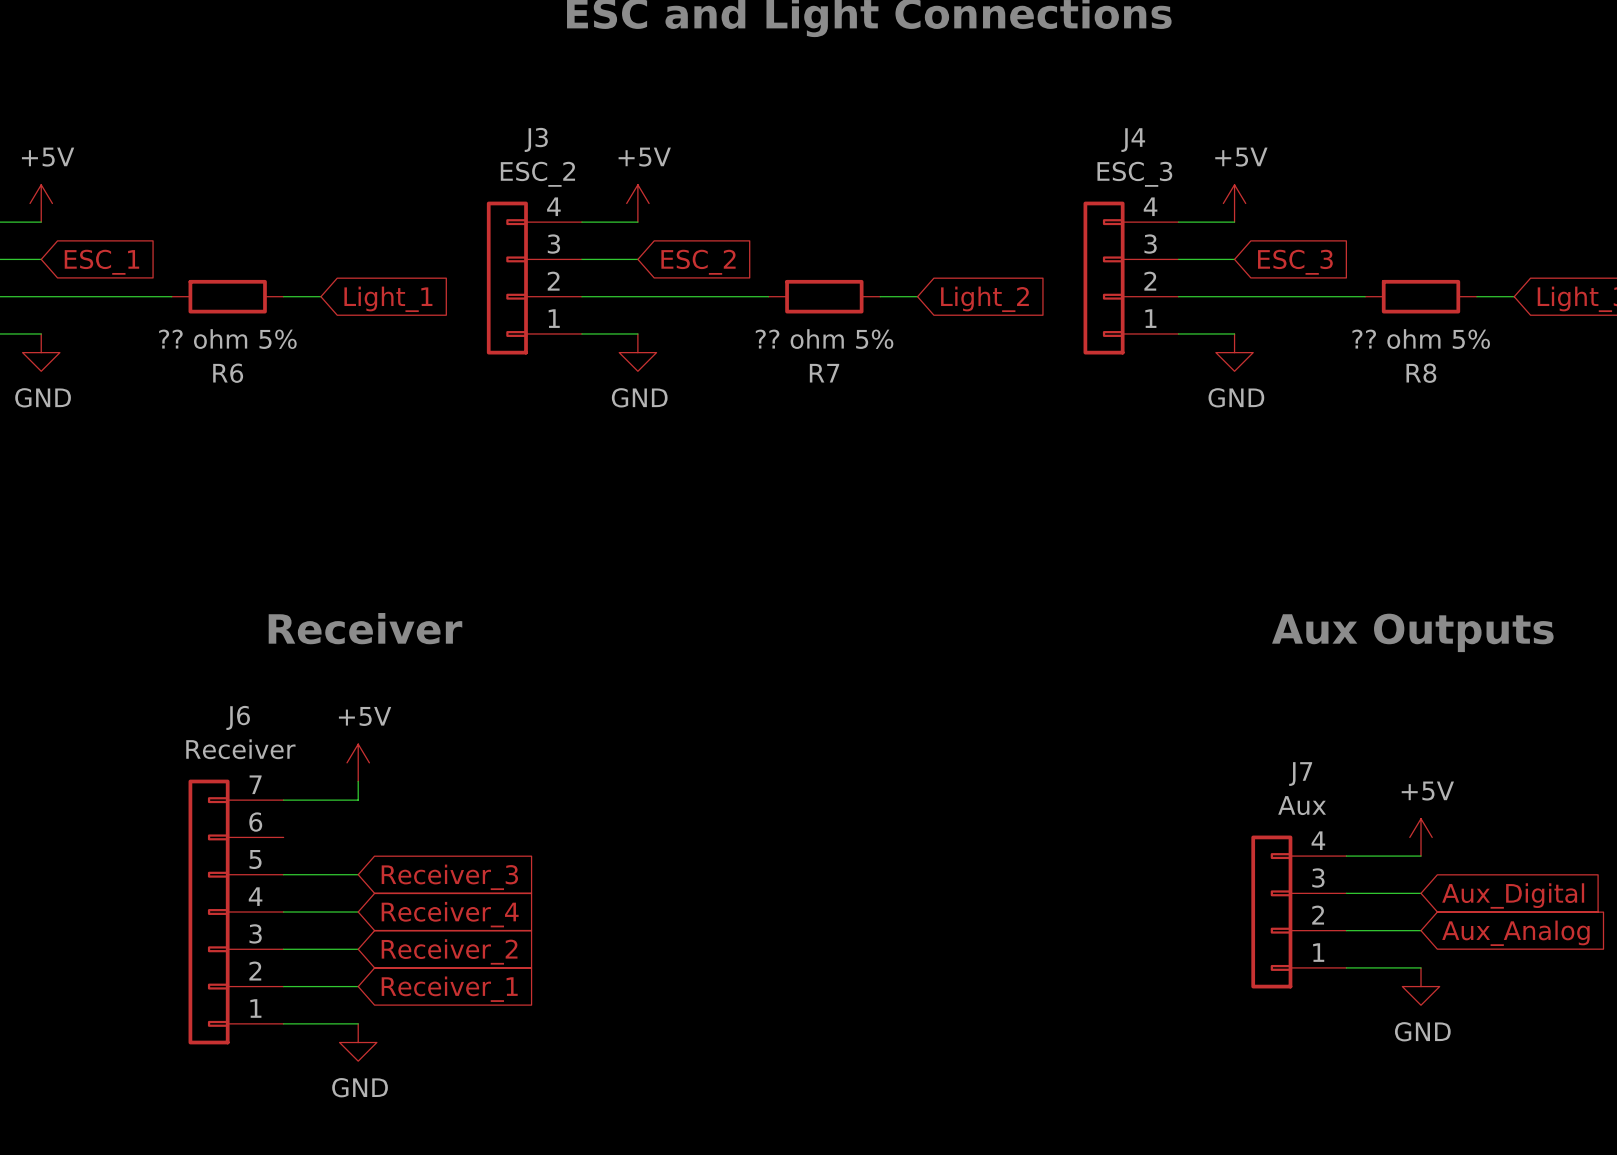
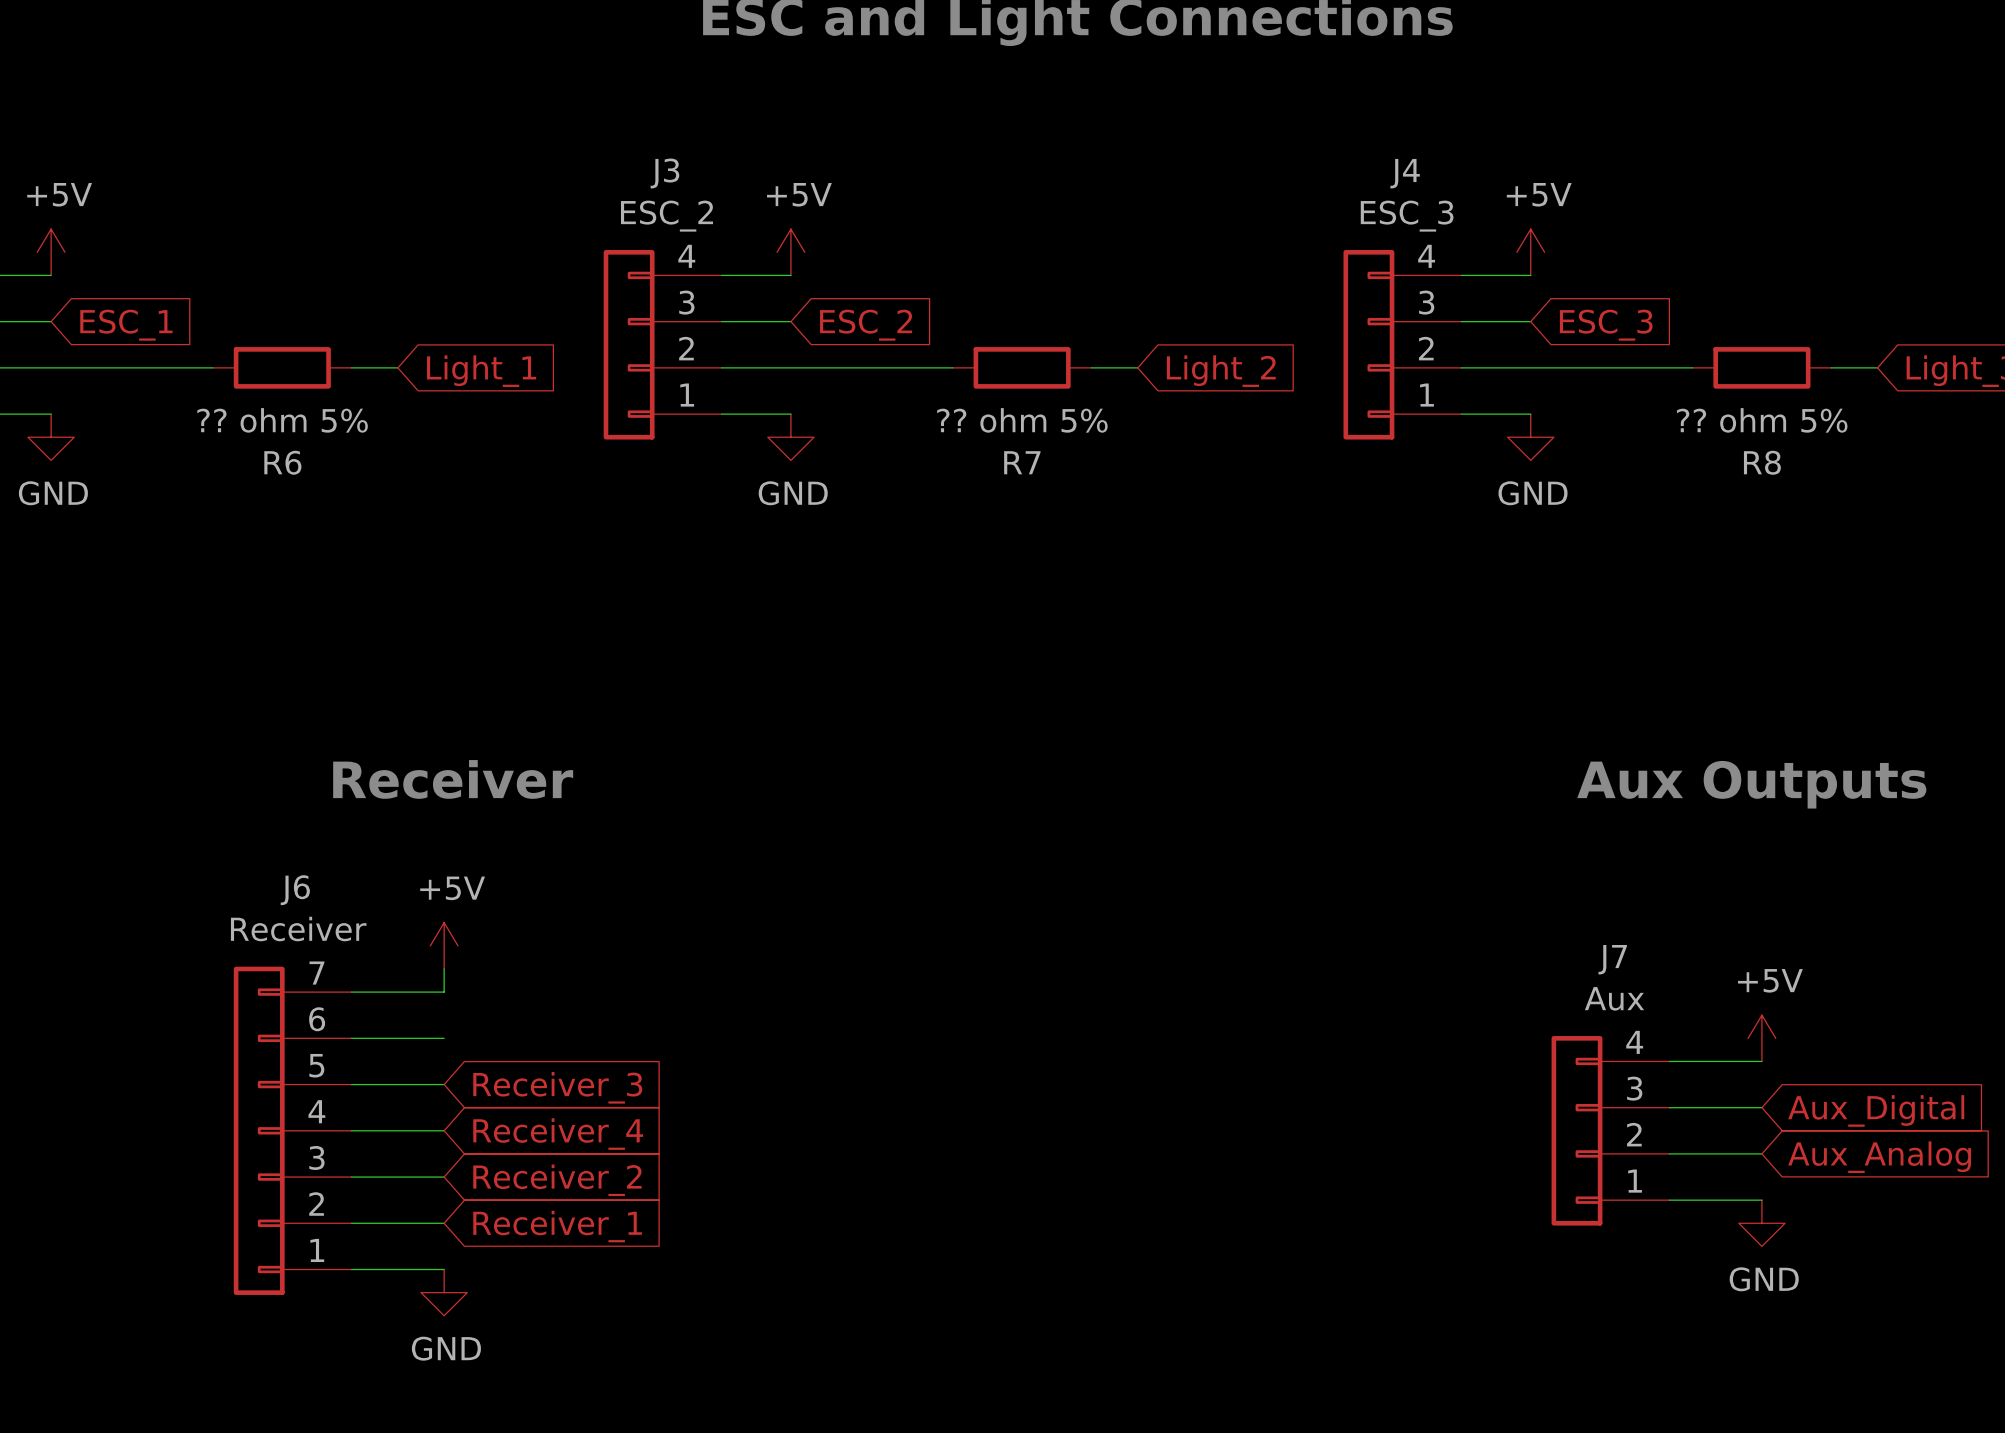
wire: none -> (351, 1038) (444, 1038)

